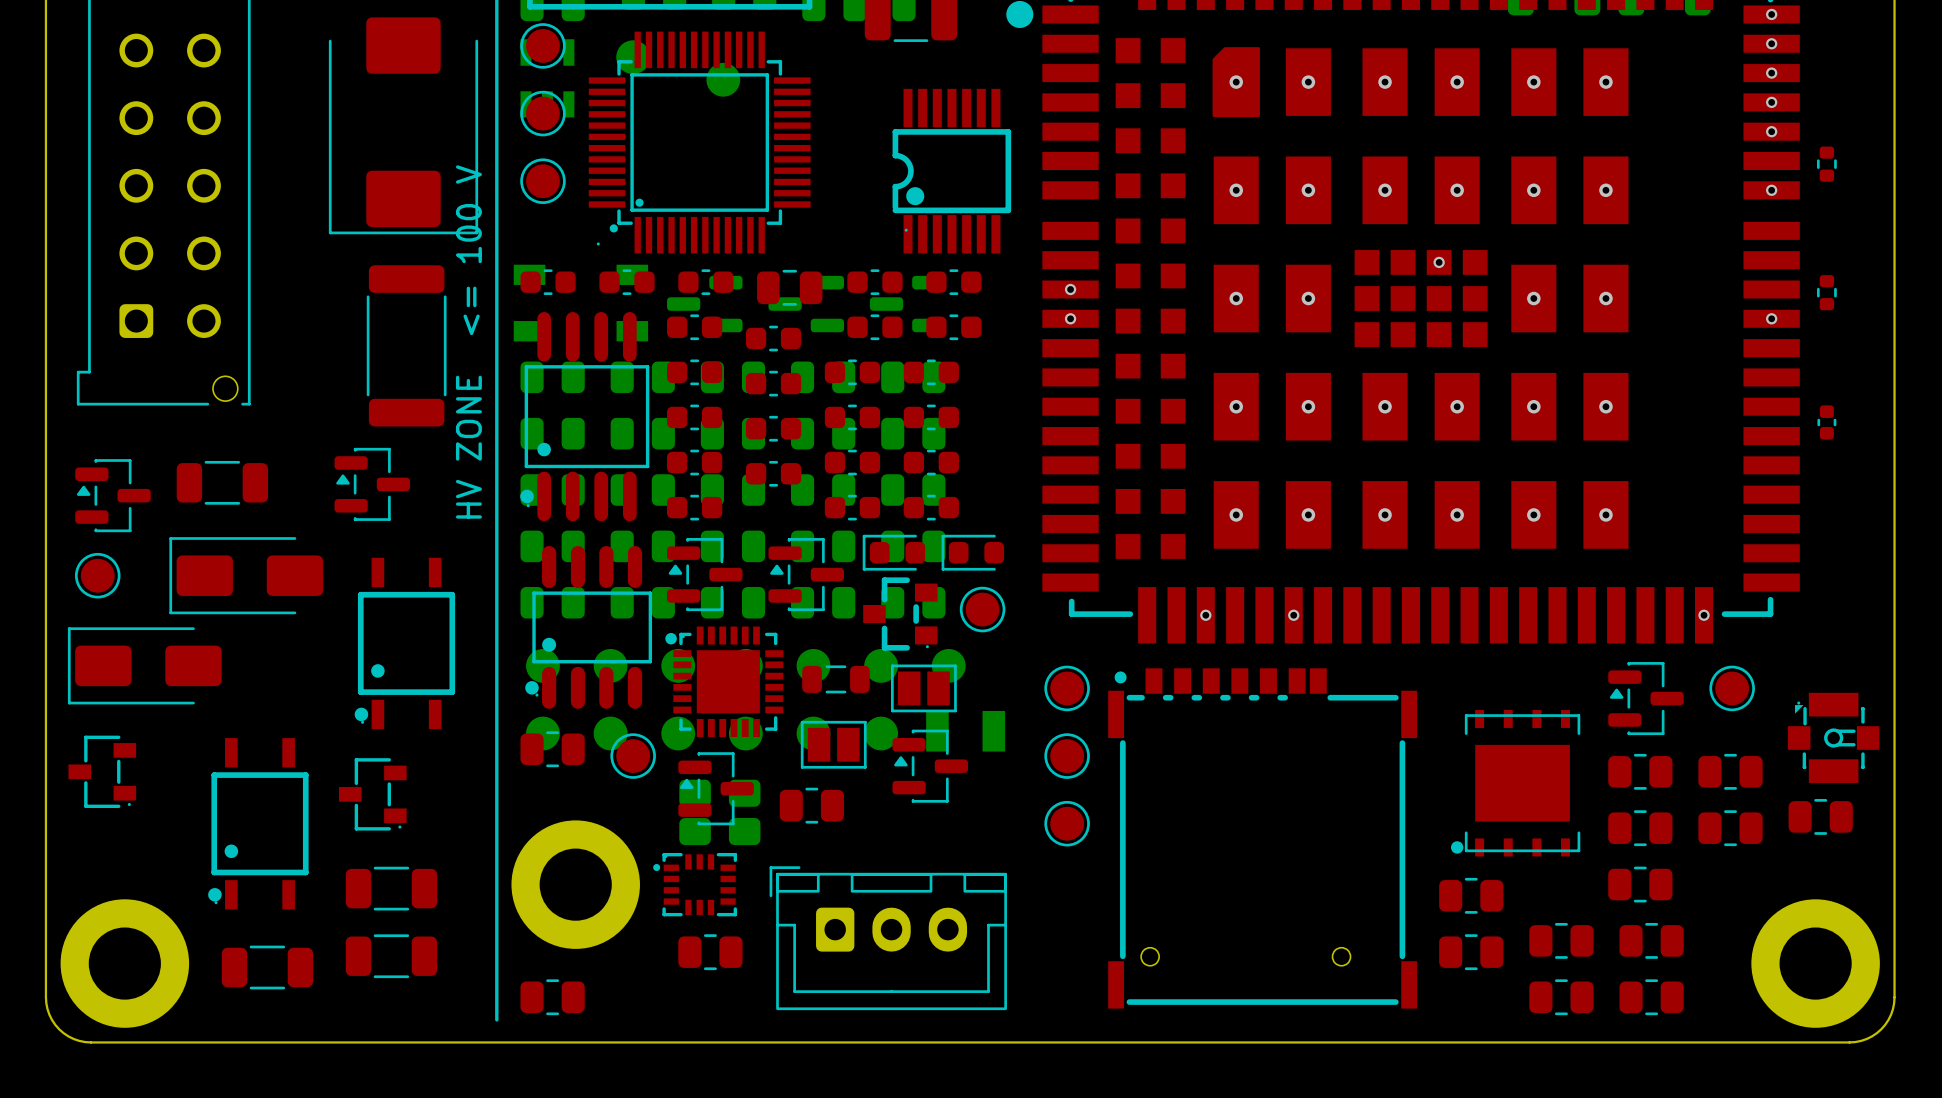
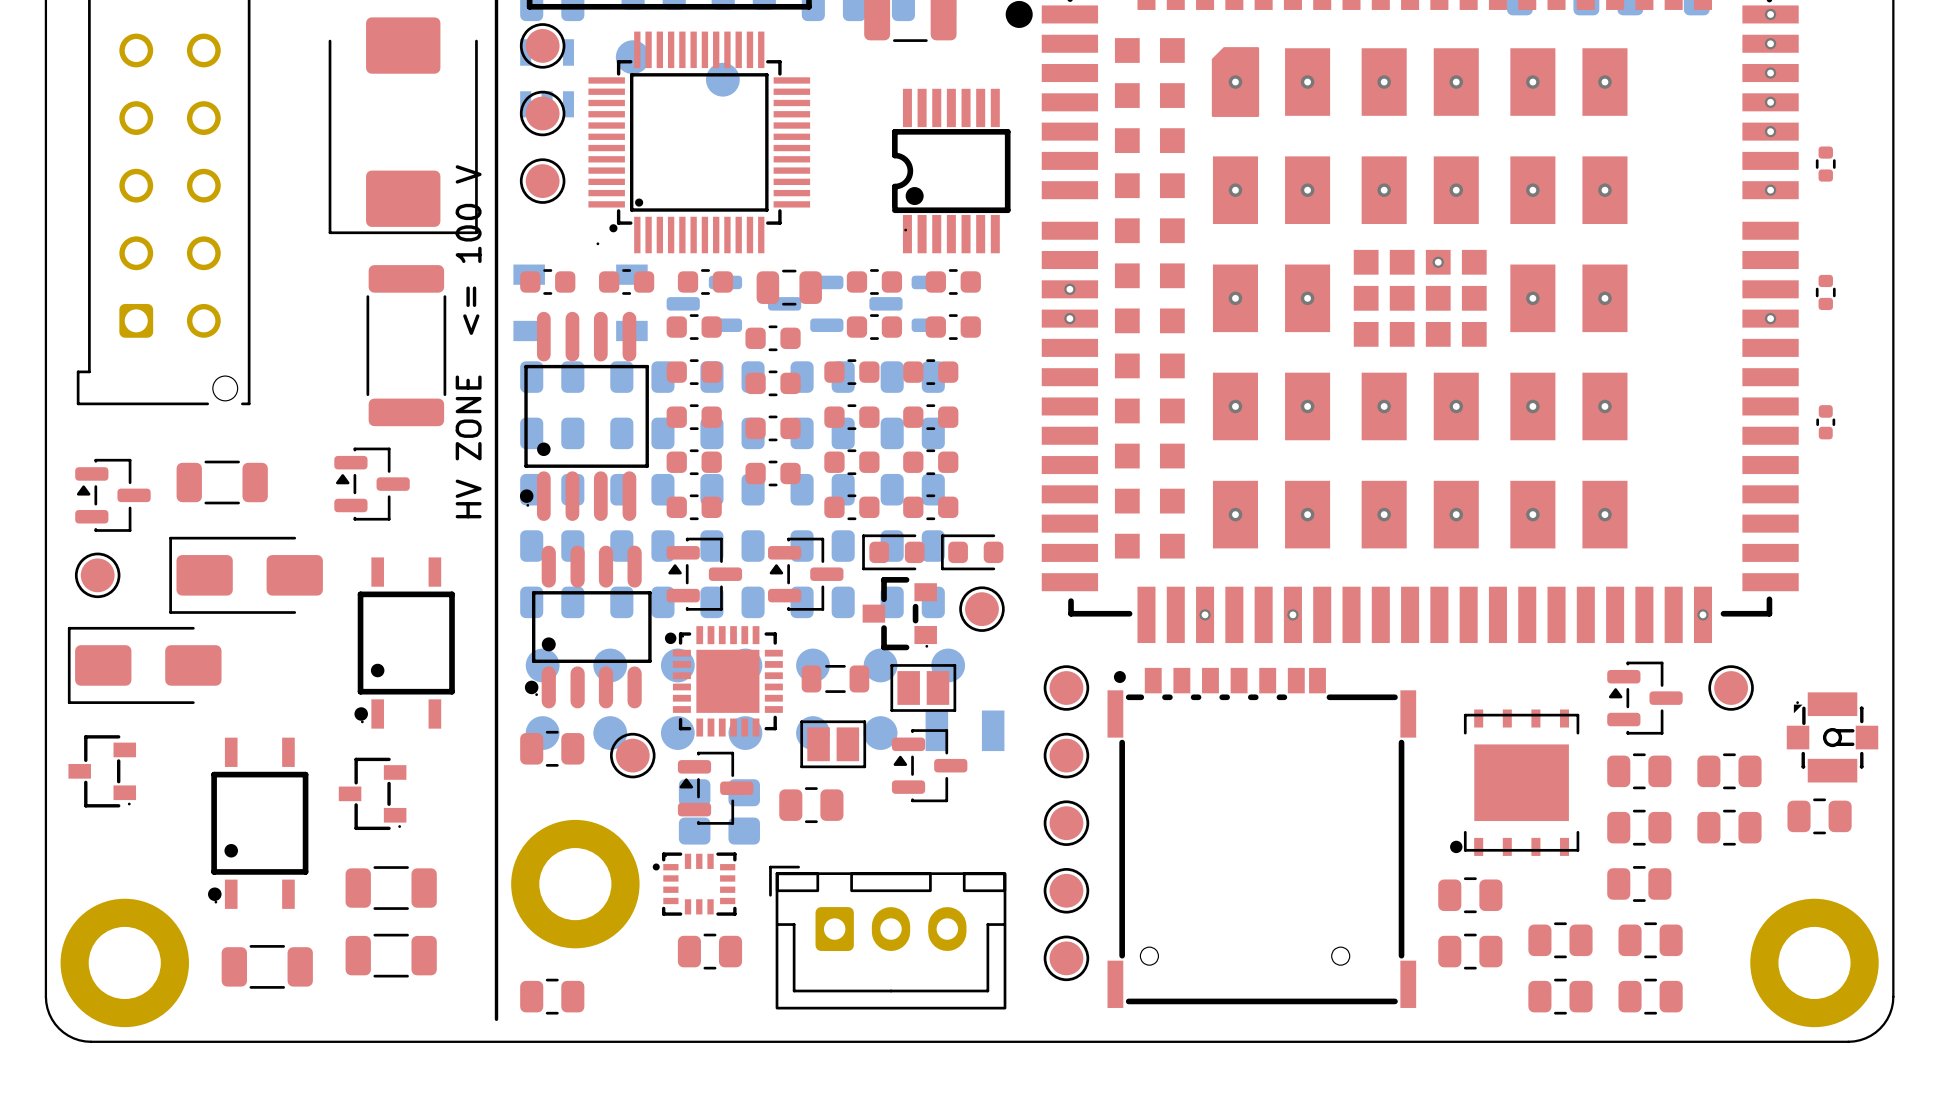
part: none -> (1066, 890)
part: none -> (1066, 958)

